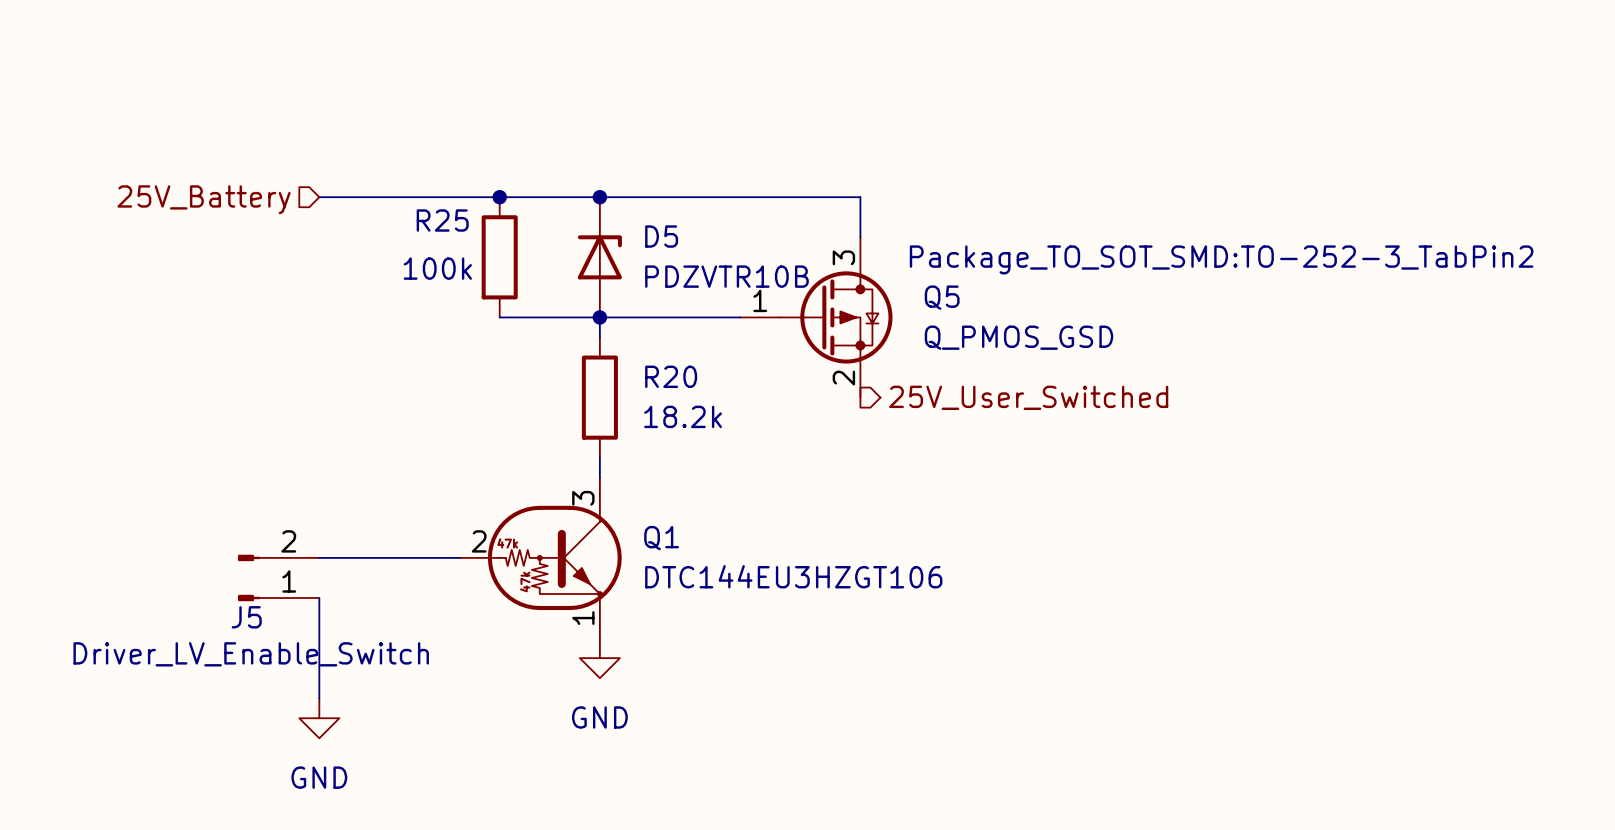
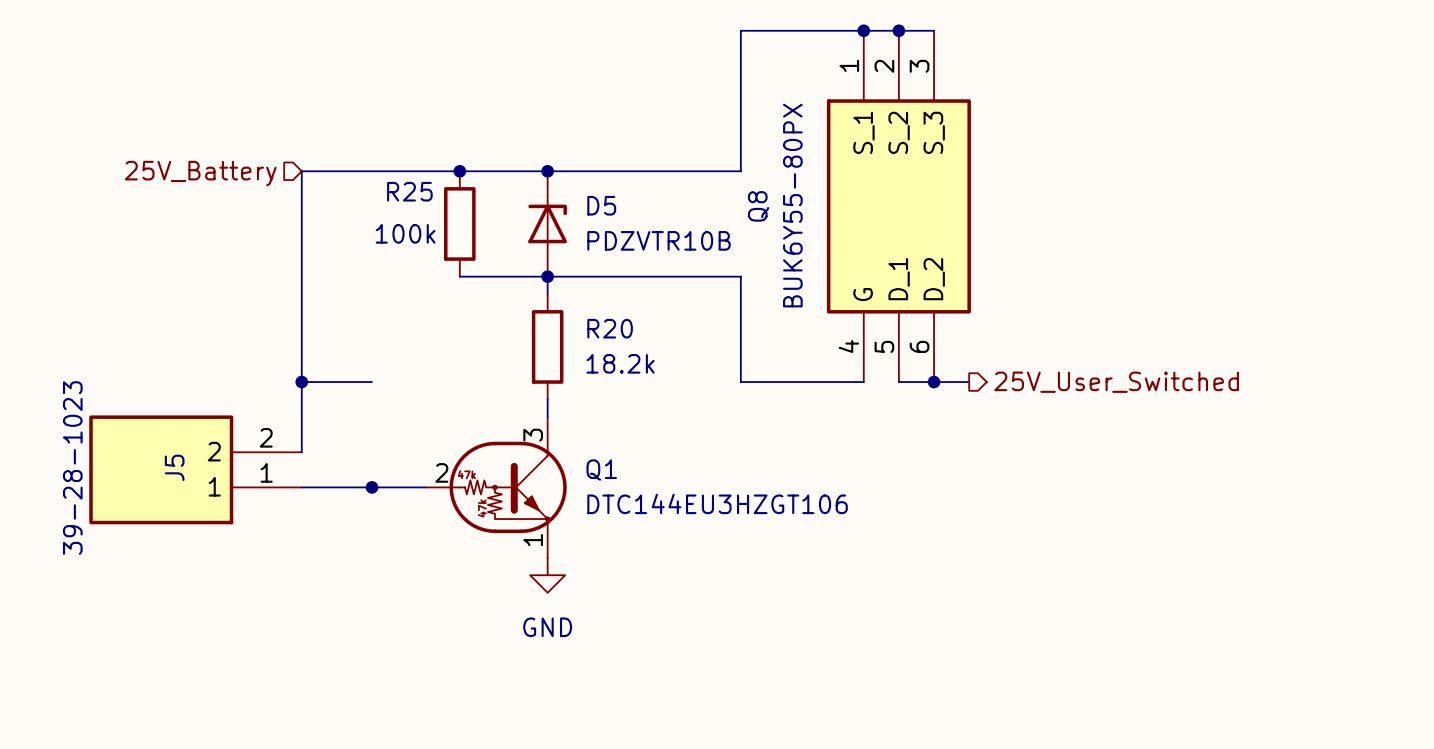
junction: none -> (863, 30)
junction: none -> (898, 30)
wire: none -> (301, 171) (301, 452)
wire: (820, 197) (860, 197) (860, 237) -> (740, 171) (740, 30) (934, 30)
Q8: none -> BUK6Y55-80PX (898, 206)
wire: none -> (670, 276) (740, 276) (740, 382) (863, 382)
Q5: Q_PMOS_GSD (816, 317) -> none
hierarchical label position: 25V_User_Switched (1028, 397) -> 25V_User_Switched (1116, 382)
wire: none -> (301, 382) (372, 382)
junction: none -> (301, 382)
wire: none -> (898, 382) (969, 382)
junction: none -> (934, 382)
J5 symbol: [237, 554, 320, 602] -> [89, 415, 302, 525]
junction: none -> (372, 487)
wire: (319, 598) (319, 698) -> none
J5 name position: J5 (246, 617) -> J5 (174, 467)
J5 value: Driver_LV_Enable_Switch (251, 654) -> 39-28-1023 (72, 468)
power symbol: GND (319, 718) -> none

